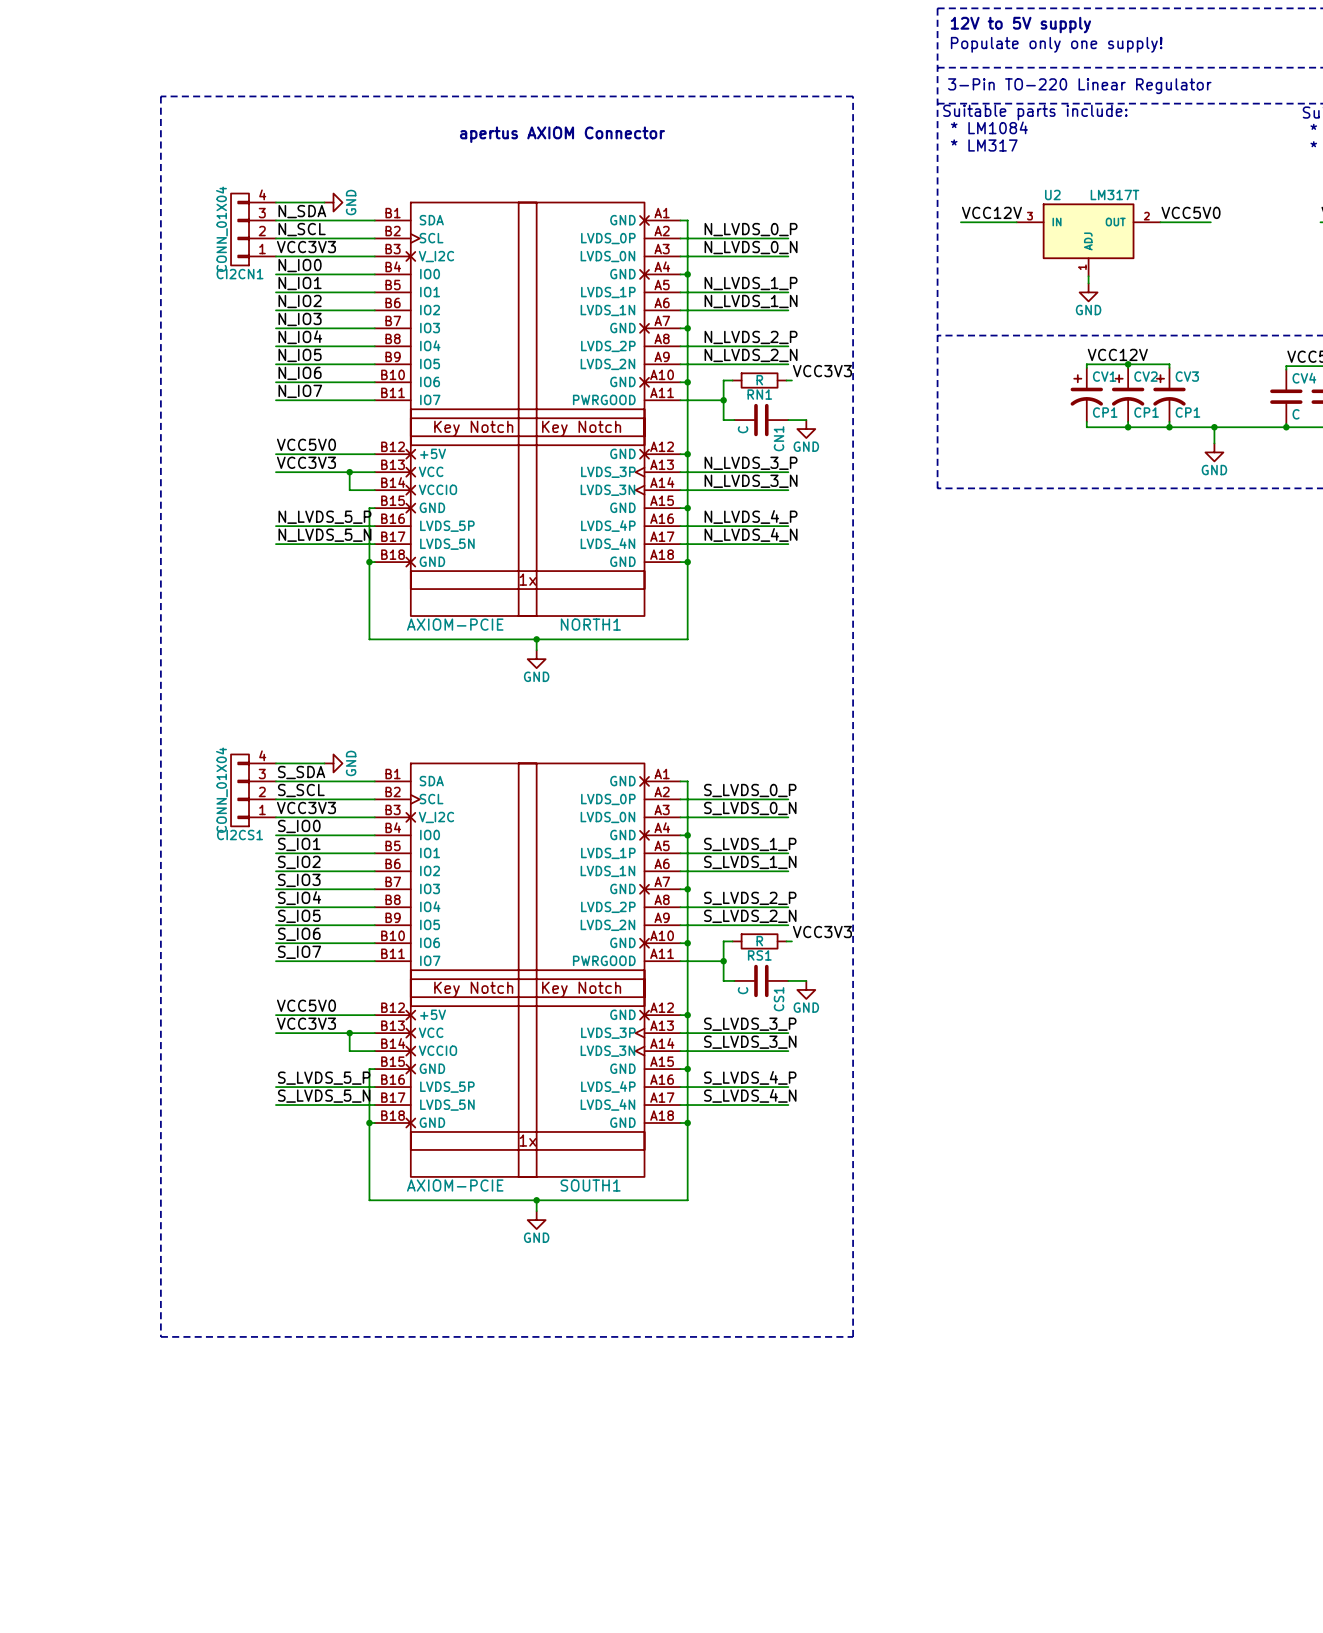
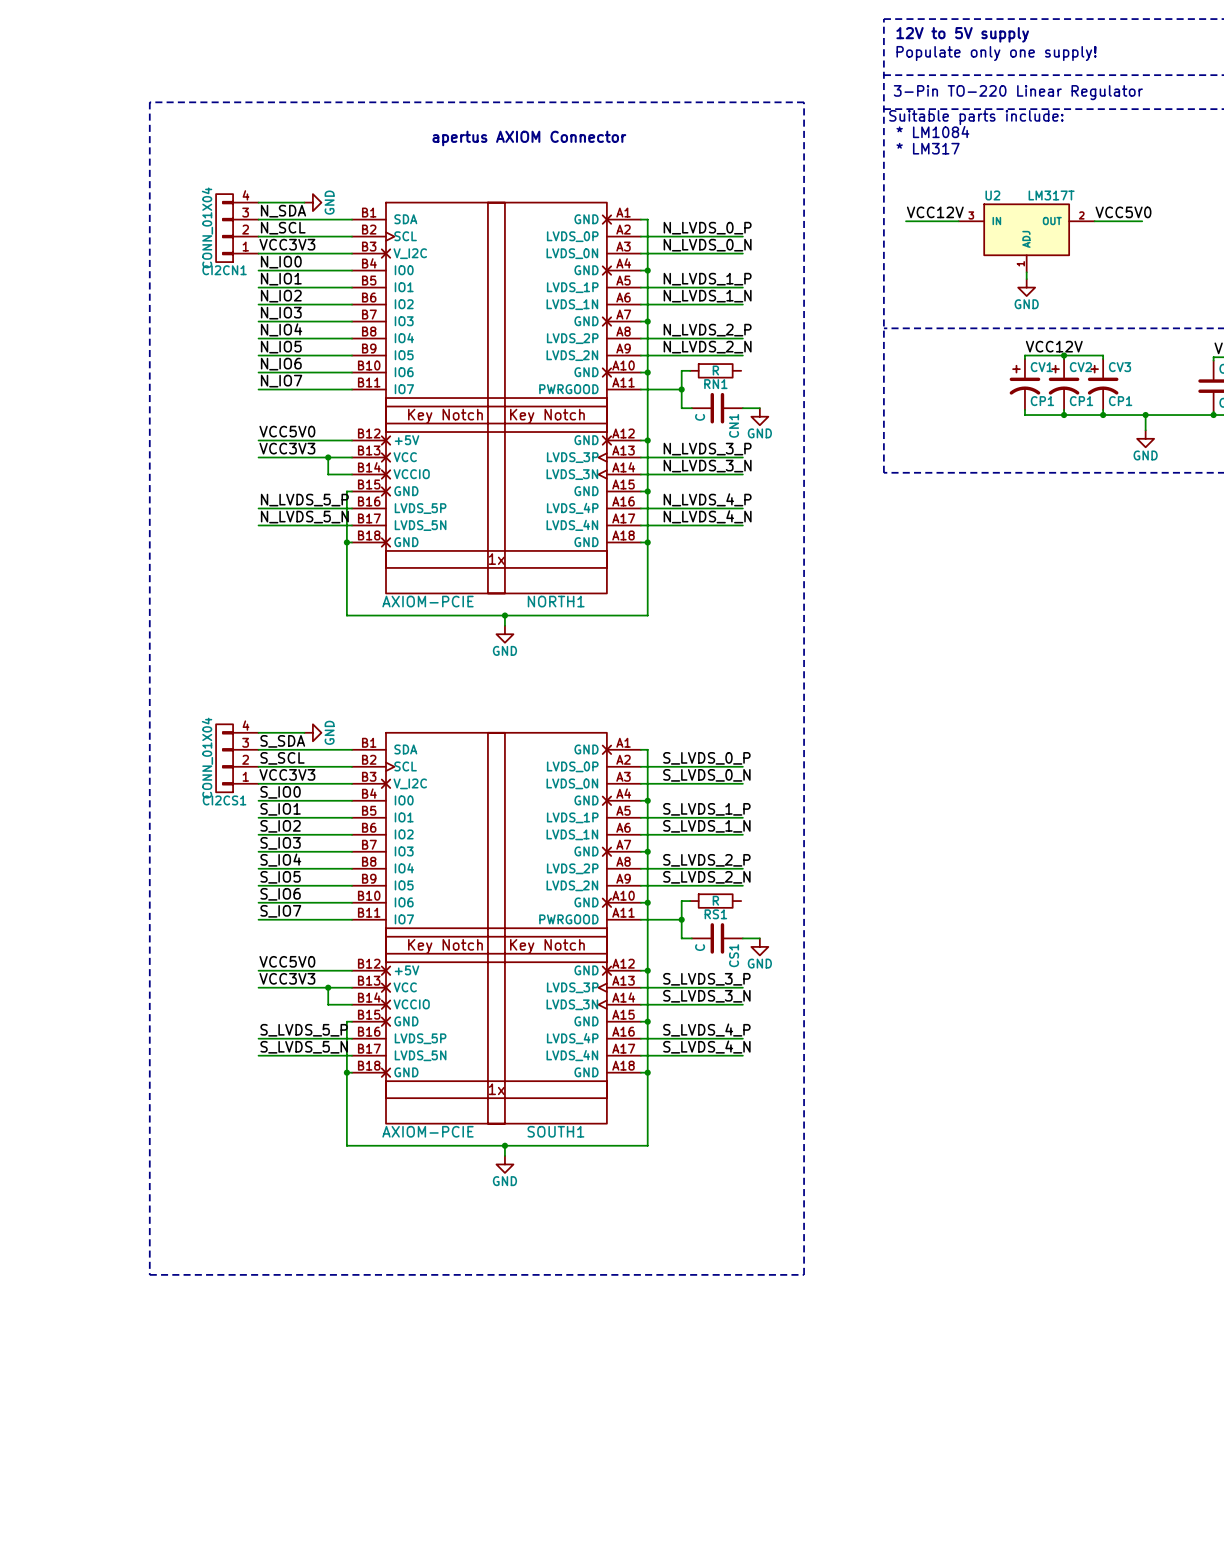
label: VCC3V3 (822, 371) -> none
wire: (786, 380) (791, 380) -> none
label: VCC3V3 (822, 932) -> none
wire: (786, 941) (791, 941) -> none

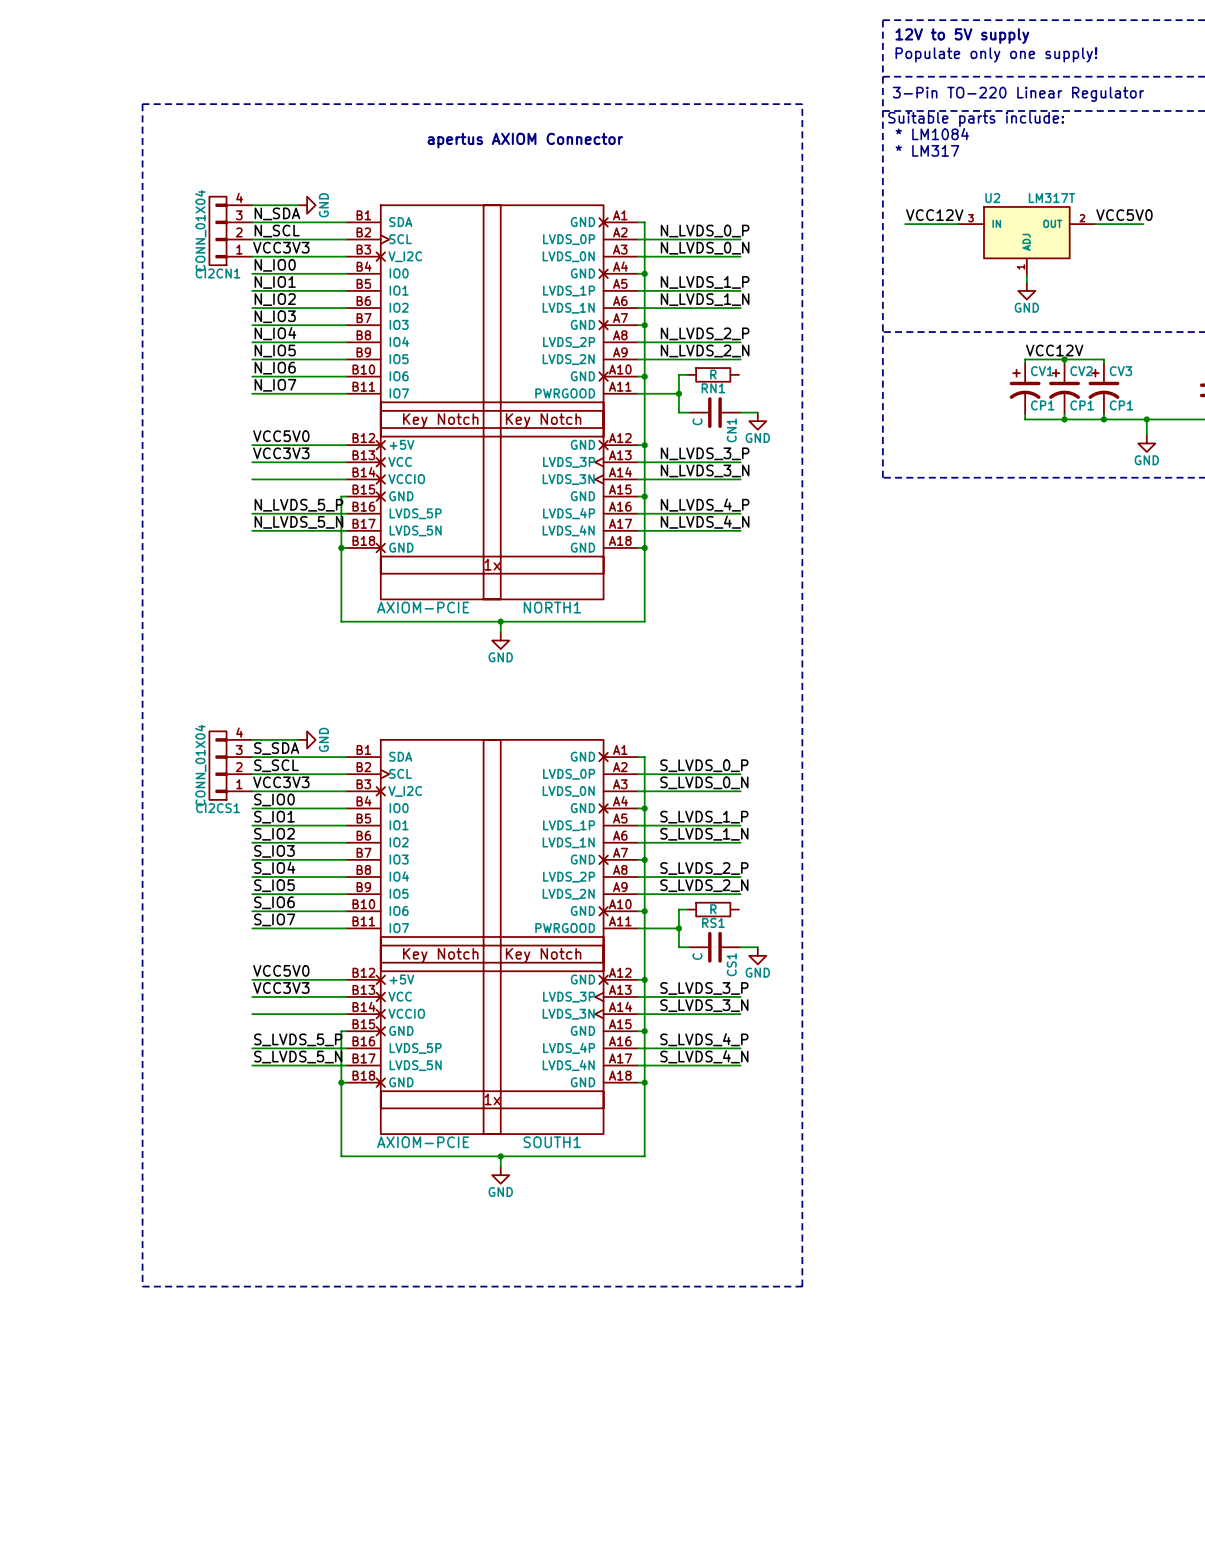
wire: (328, 457) (328, 474) -> (252, 479) (322, 479)
junction: (328, 457) -> none
wire: (328, 987) (328, 1004) -> (252, 1014) (322, 1014)
junction: (328, 987) -> none

